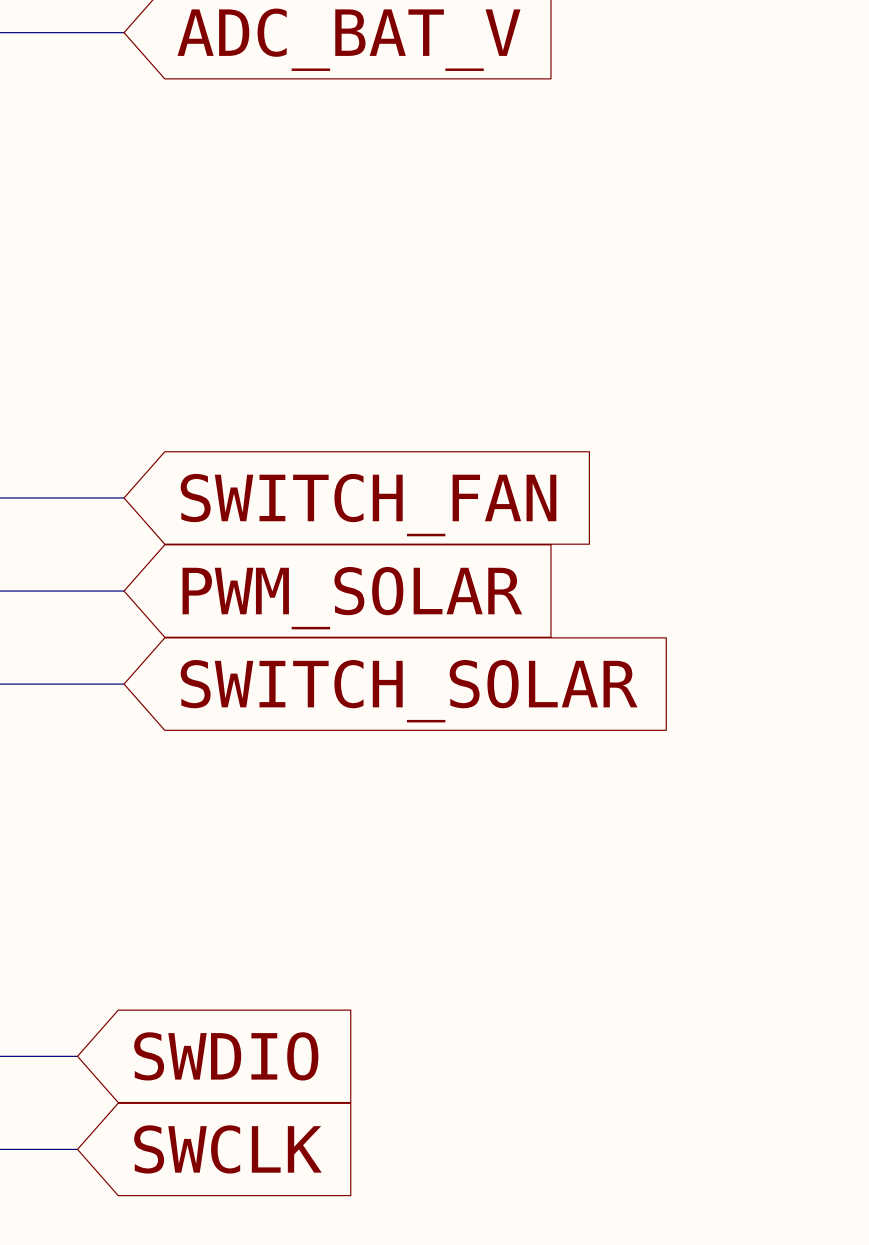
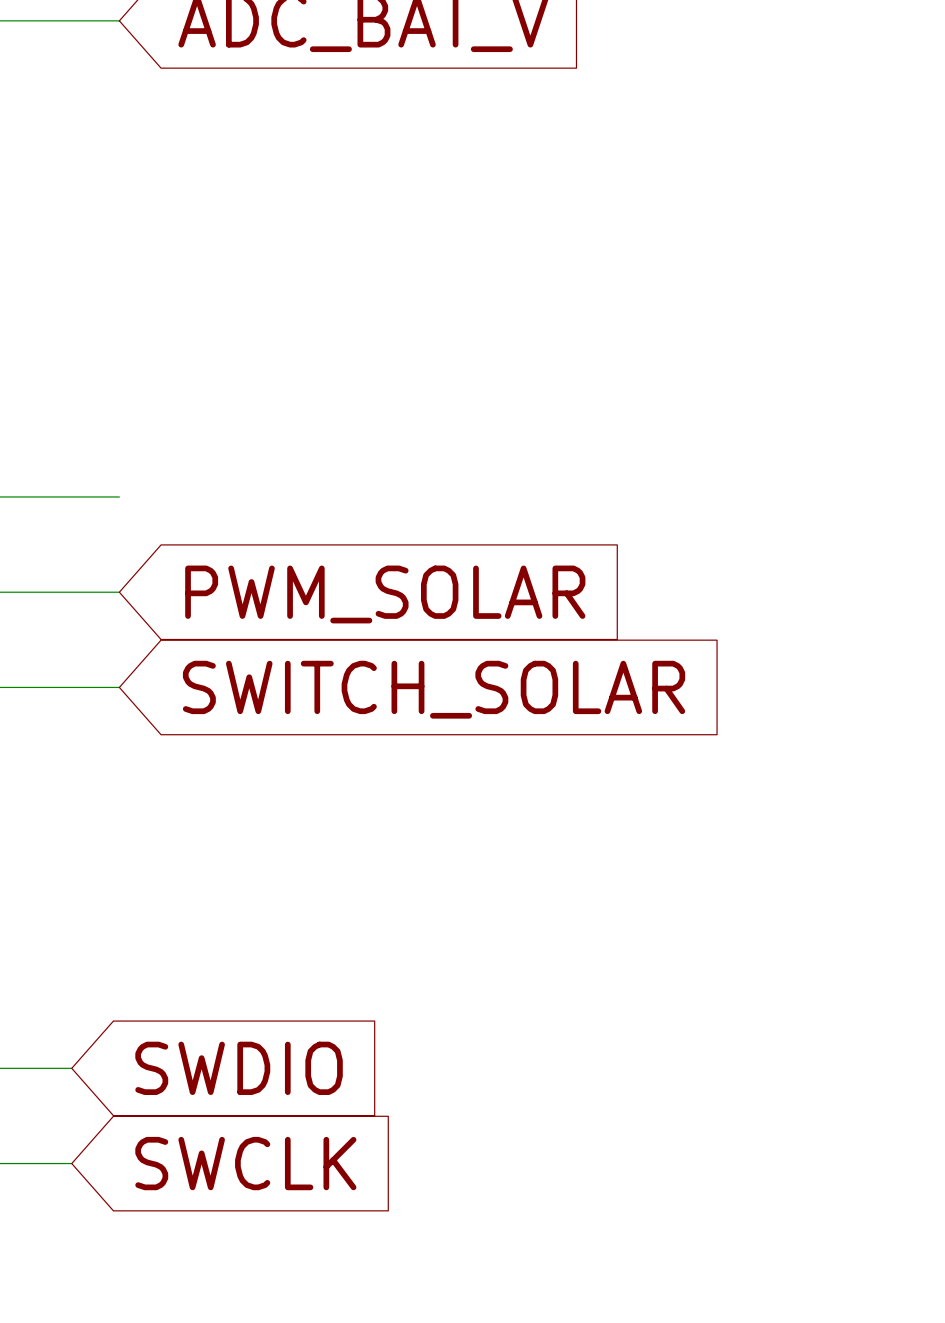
global label: SWITCH_FAN (368, 505) -> none

